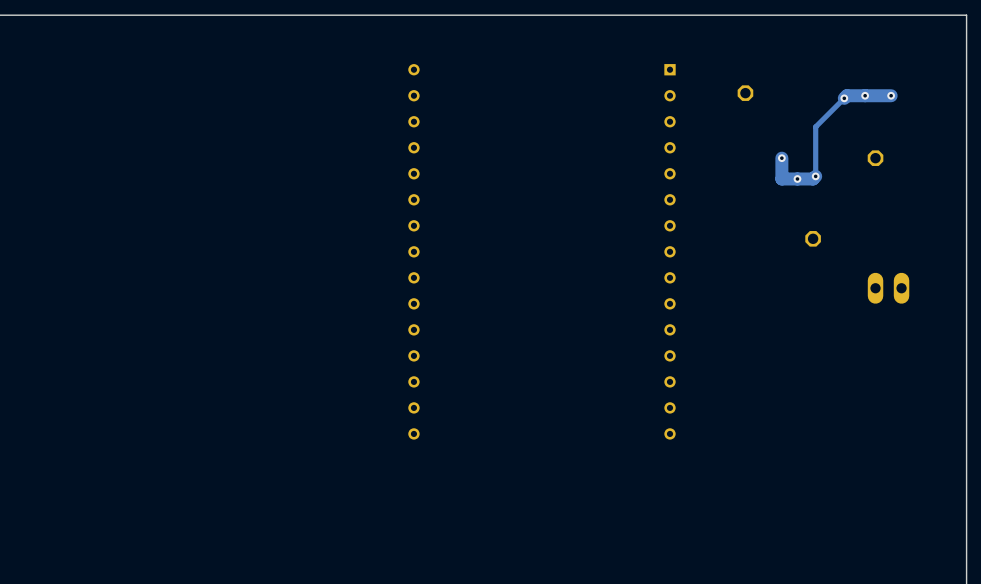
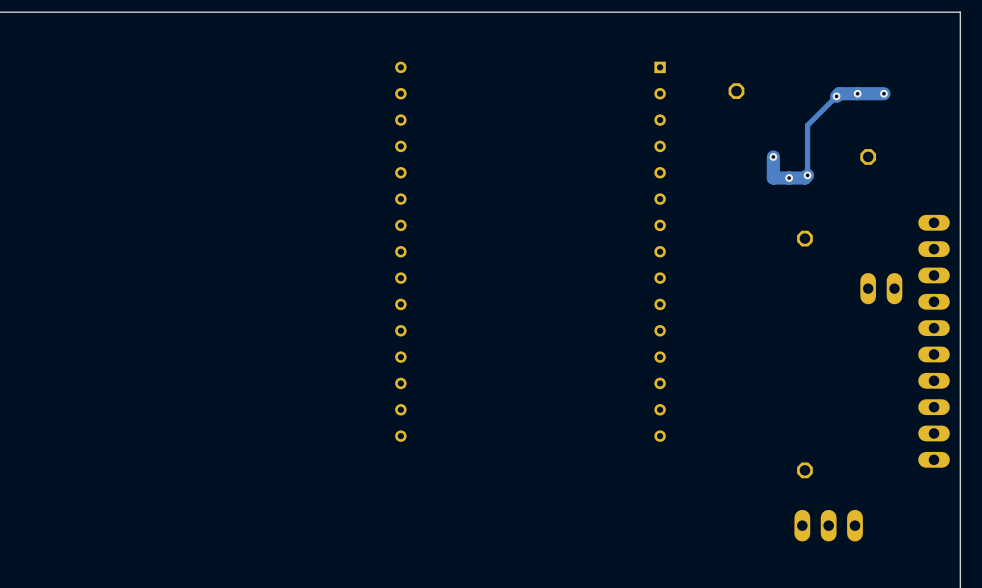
part: none -> (934, 341)
part: none -> (804, 470)
part: none -> (828, 525)

